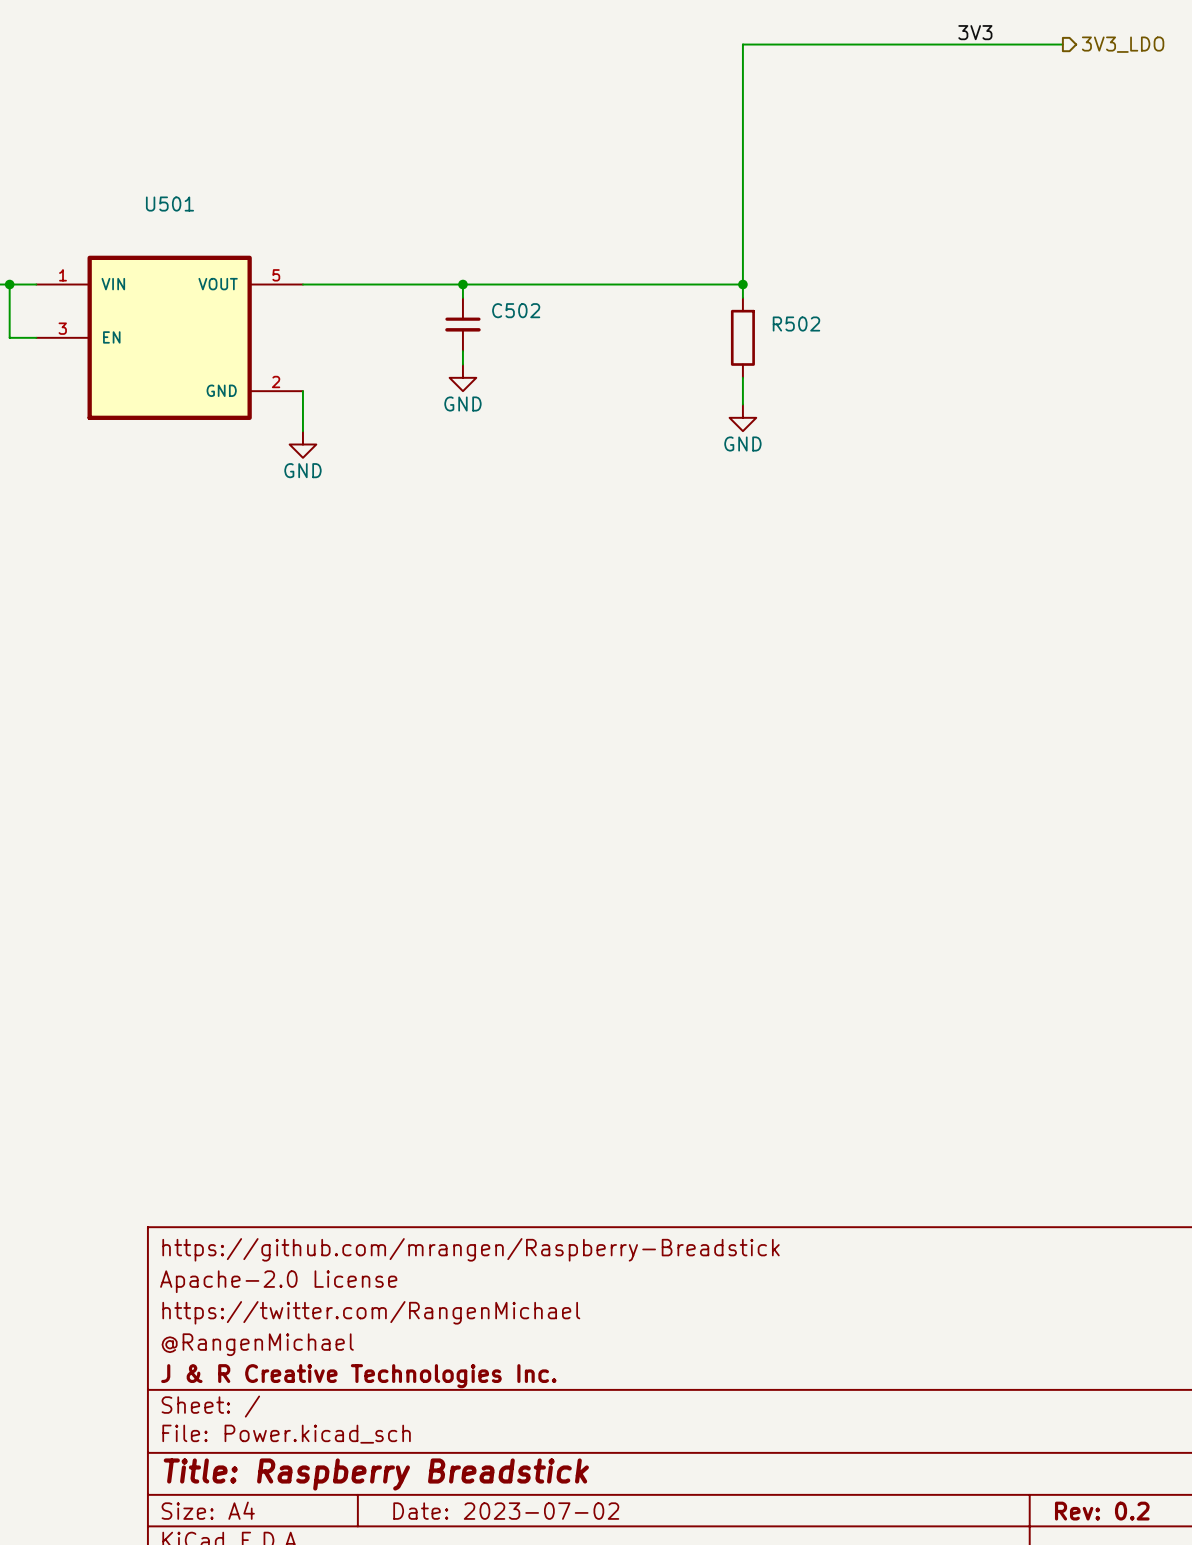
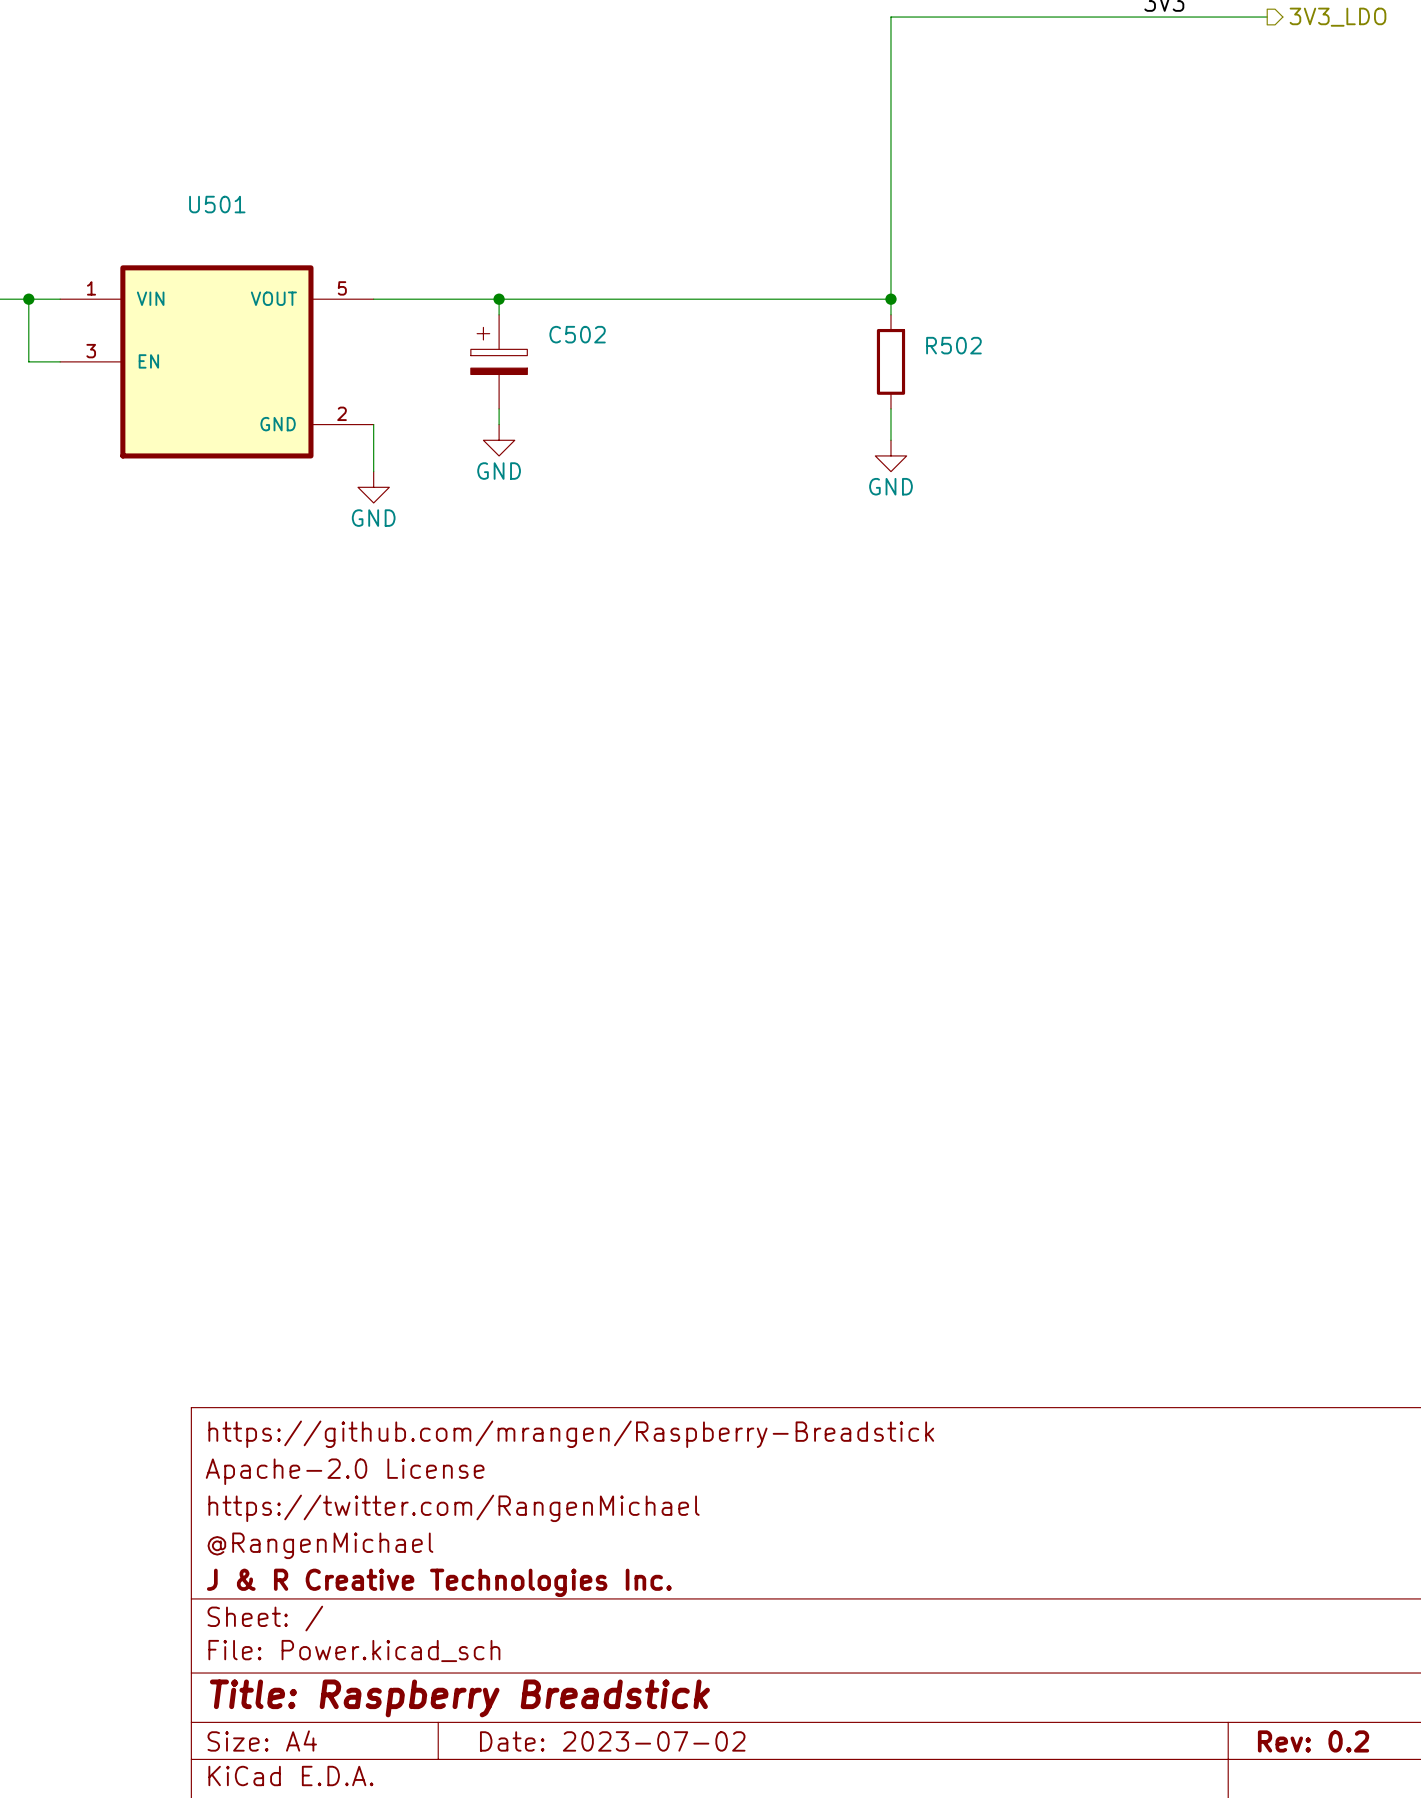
wire: (462, 284) (462, 297) -> (499, 299) (499, 314)
junction position: (462, 284) -> (499, 299)
C502 symbol: [445, 297, 481, 352] -> [470, 314, 528, 409]
C502 name position: C502 (516, 310) -> C502 (577, 334)
wire: (462, 351) (462, 364) -> (499, 408) (499, 424)
power symbol position: GND (462, 377) -> GND (499, 440)

